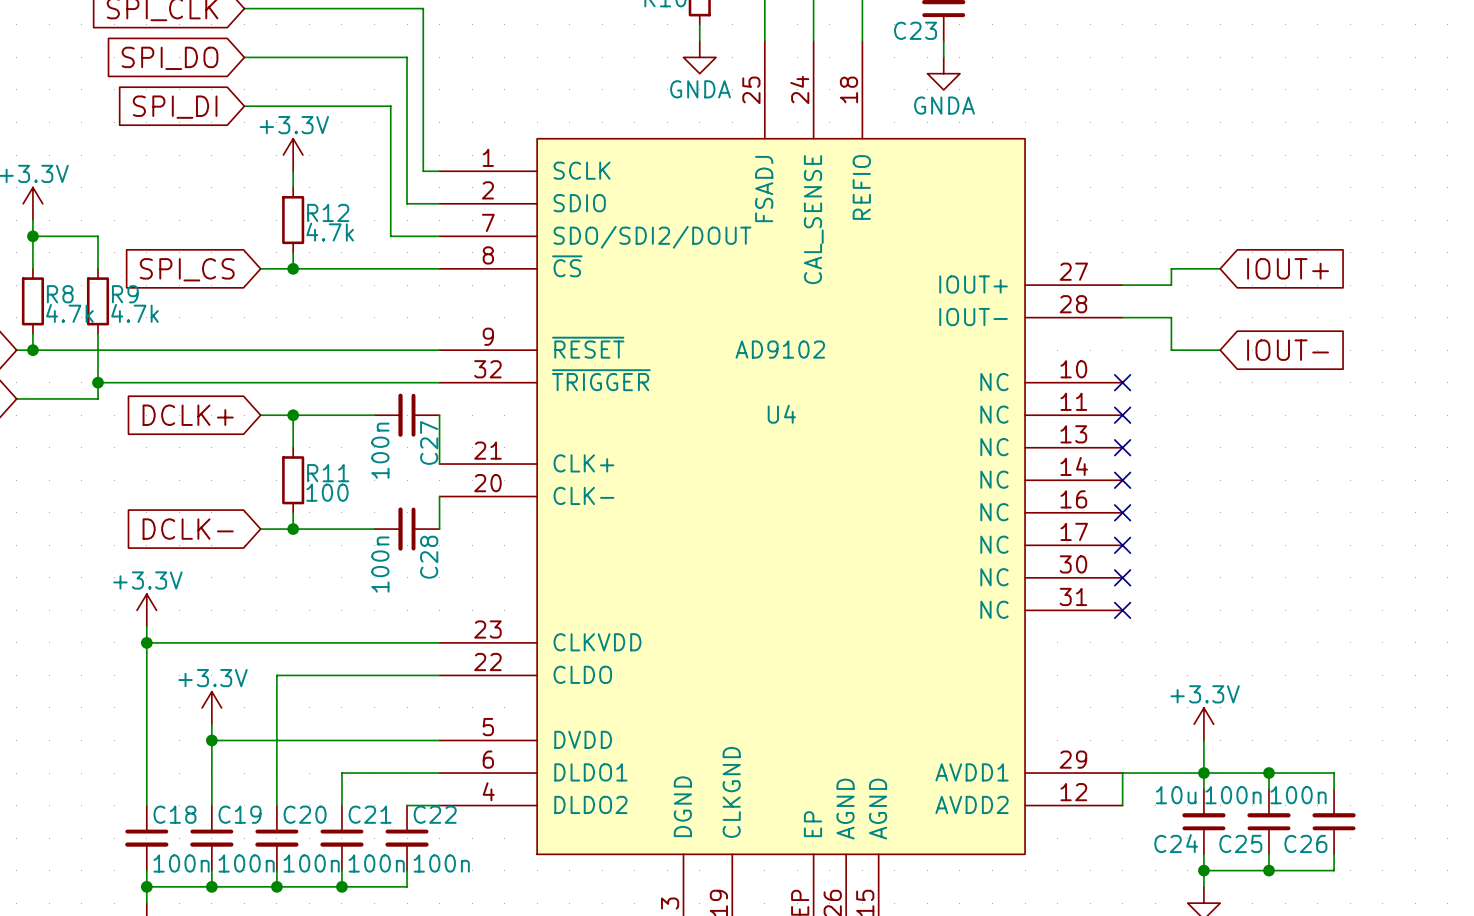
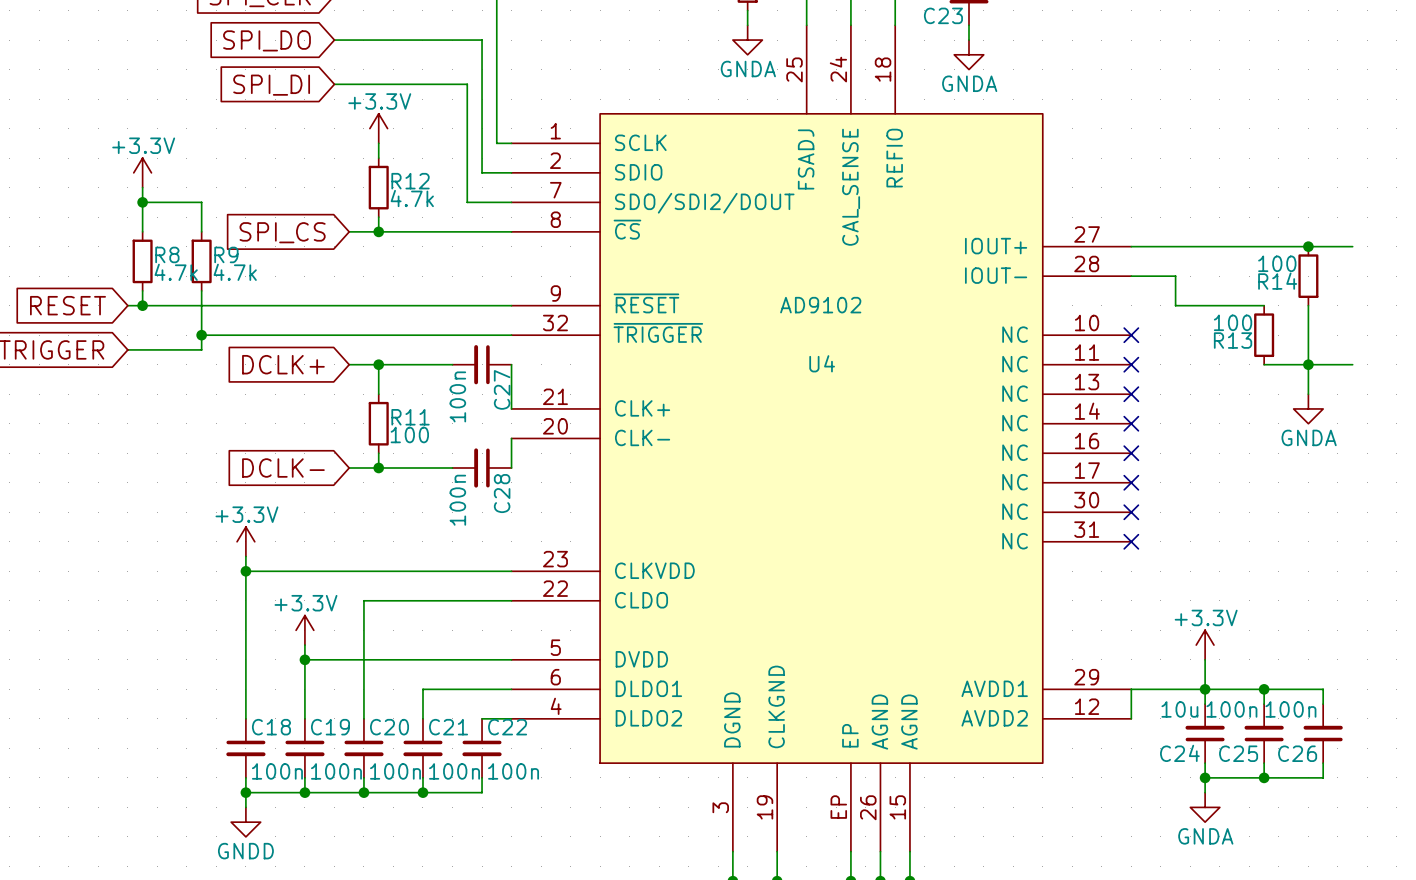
wire: (1220, 268) (1171, 268) (1171, 285) -> (1352, 246) (1175, 246)
global label: IOUT+ (1288, 268) -> none
junction: none -> (1308, 246)
R14: none -> 100 (1308, 276)
wire: none -> (1219, 305) (1264, 305)
global label: IOUT- (1288, 350) -> none
wire: none -> (1308, 305) (1308, 394)
R13: none -> 100 (1264, 335)
wire: none -> (1264, 364) (1352, 364)
junction: none -> (1308, 364)
power symbol: none -> GNDA (1308, 408)

